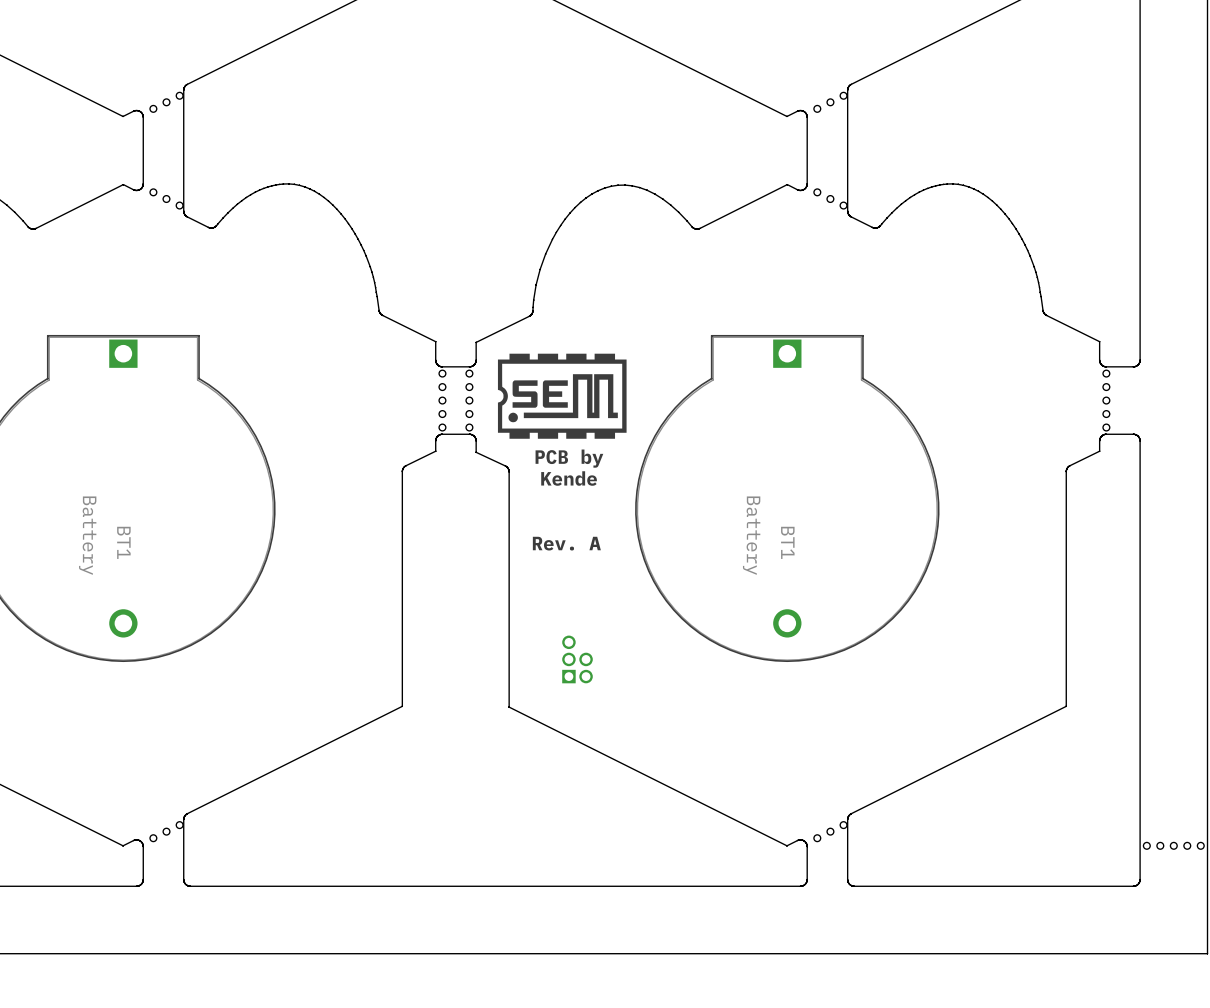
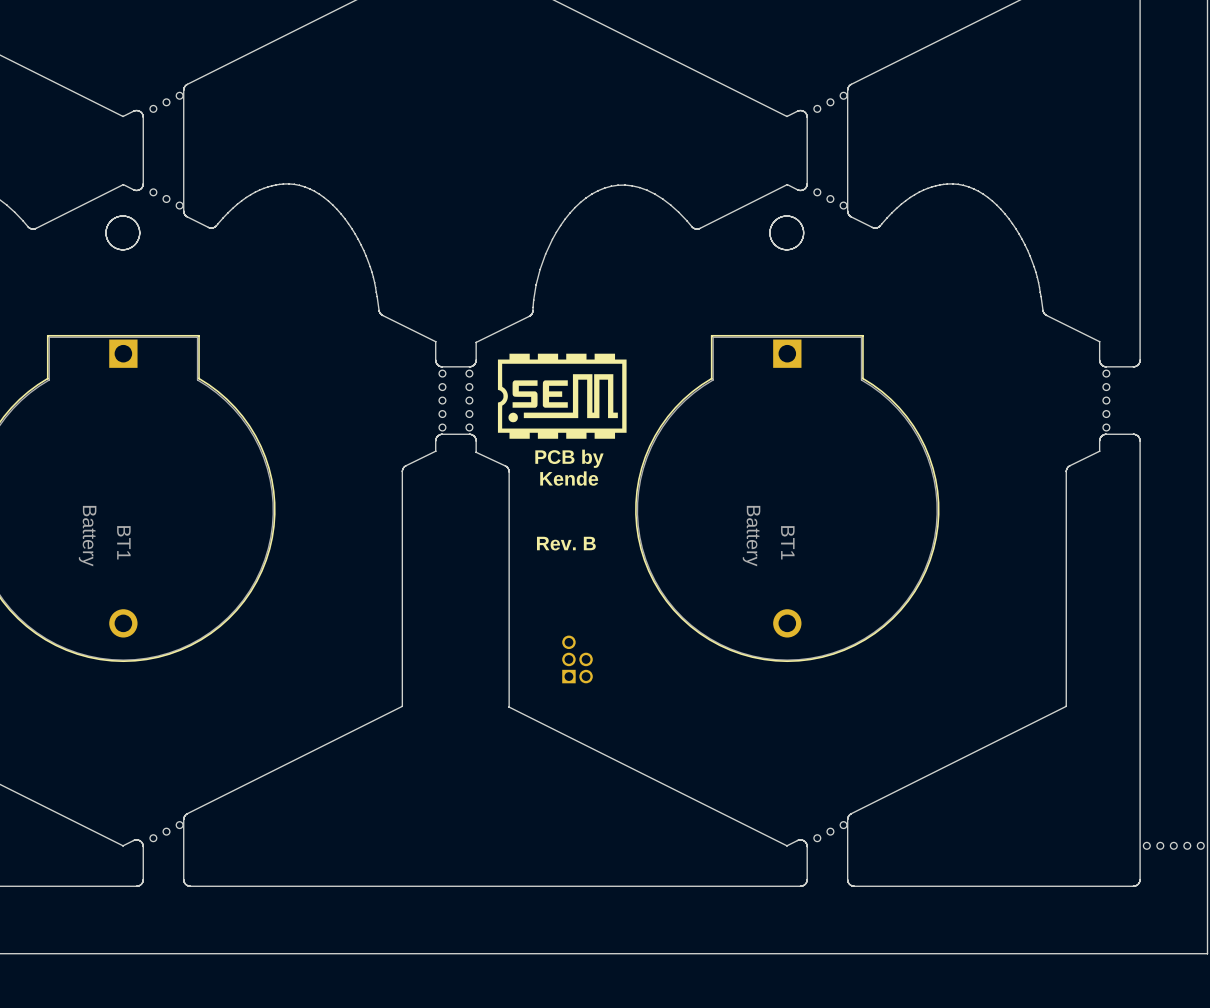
board edge: none -> (123, 216) (135, 221) (139, 233) (134, 245) (122, 249) (110, 244) (106, 232) (111, 220) (123, 216)
board edge: none -> (787, 216) (799, 221) (803, 233) (798, 245) (786, 249) (774, 244) (769, 232) (775, 220) (787, 216)
text: Rev. A (566, 543) -> Rev. B (566, 543)

